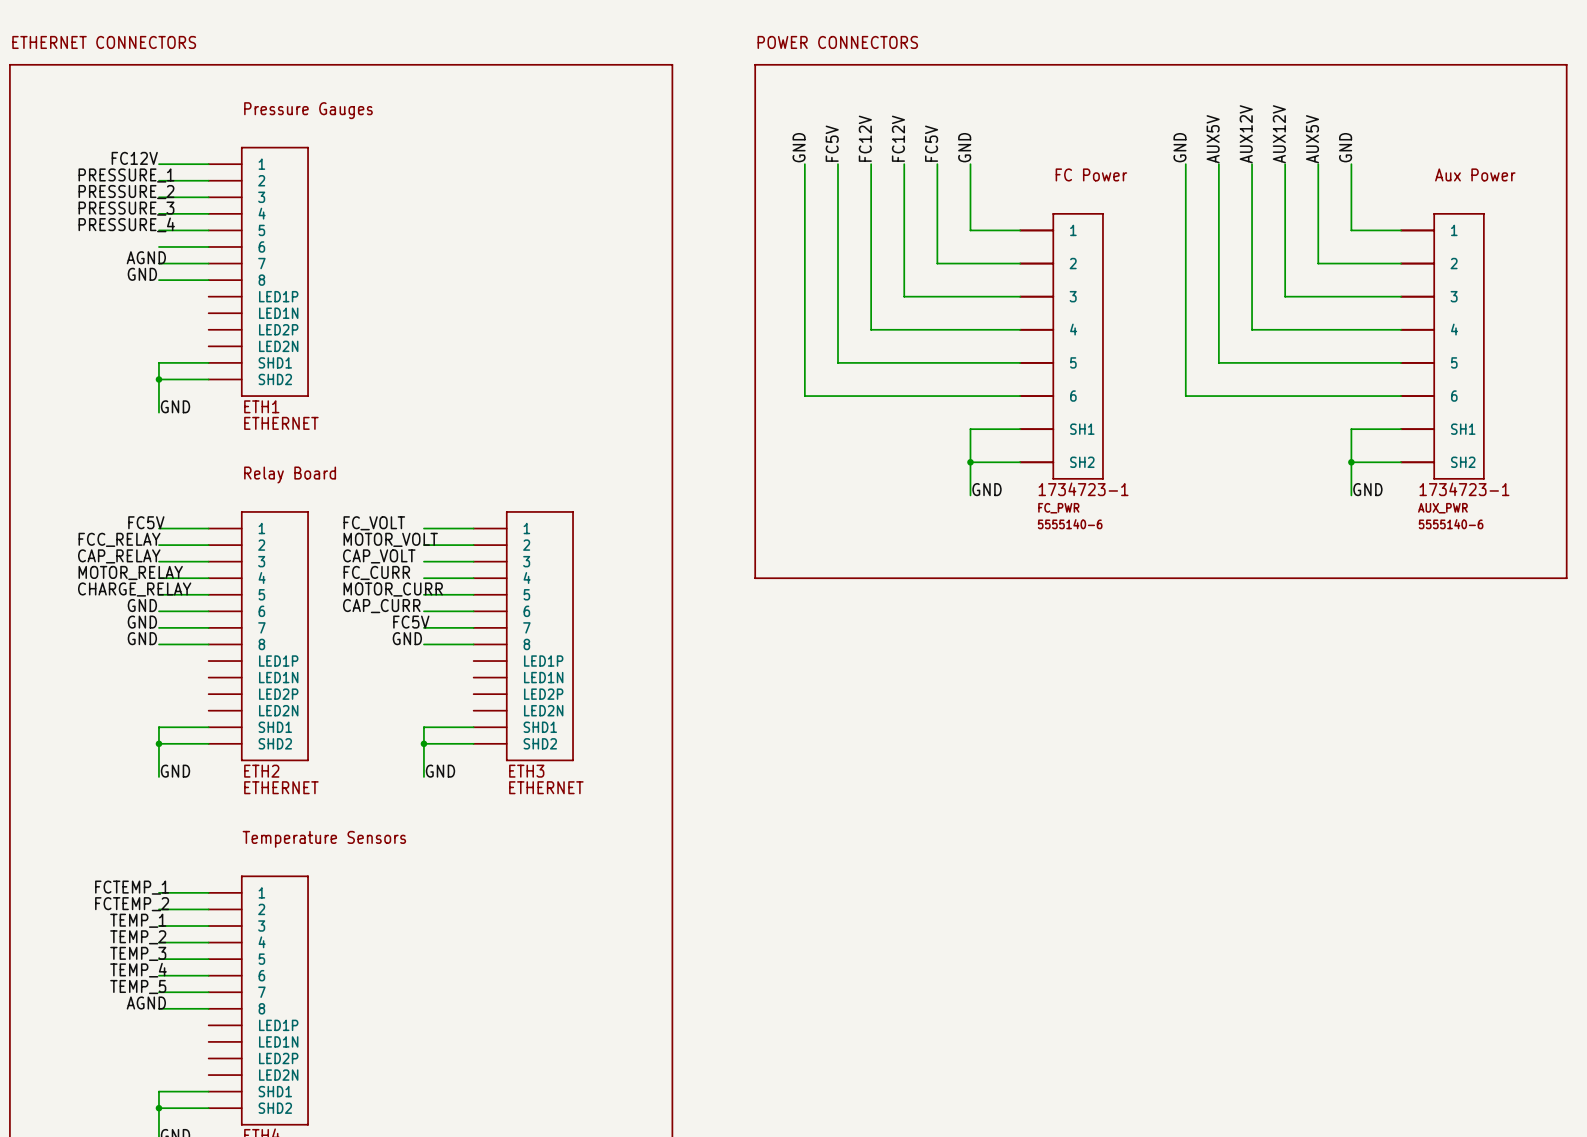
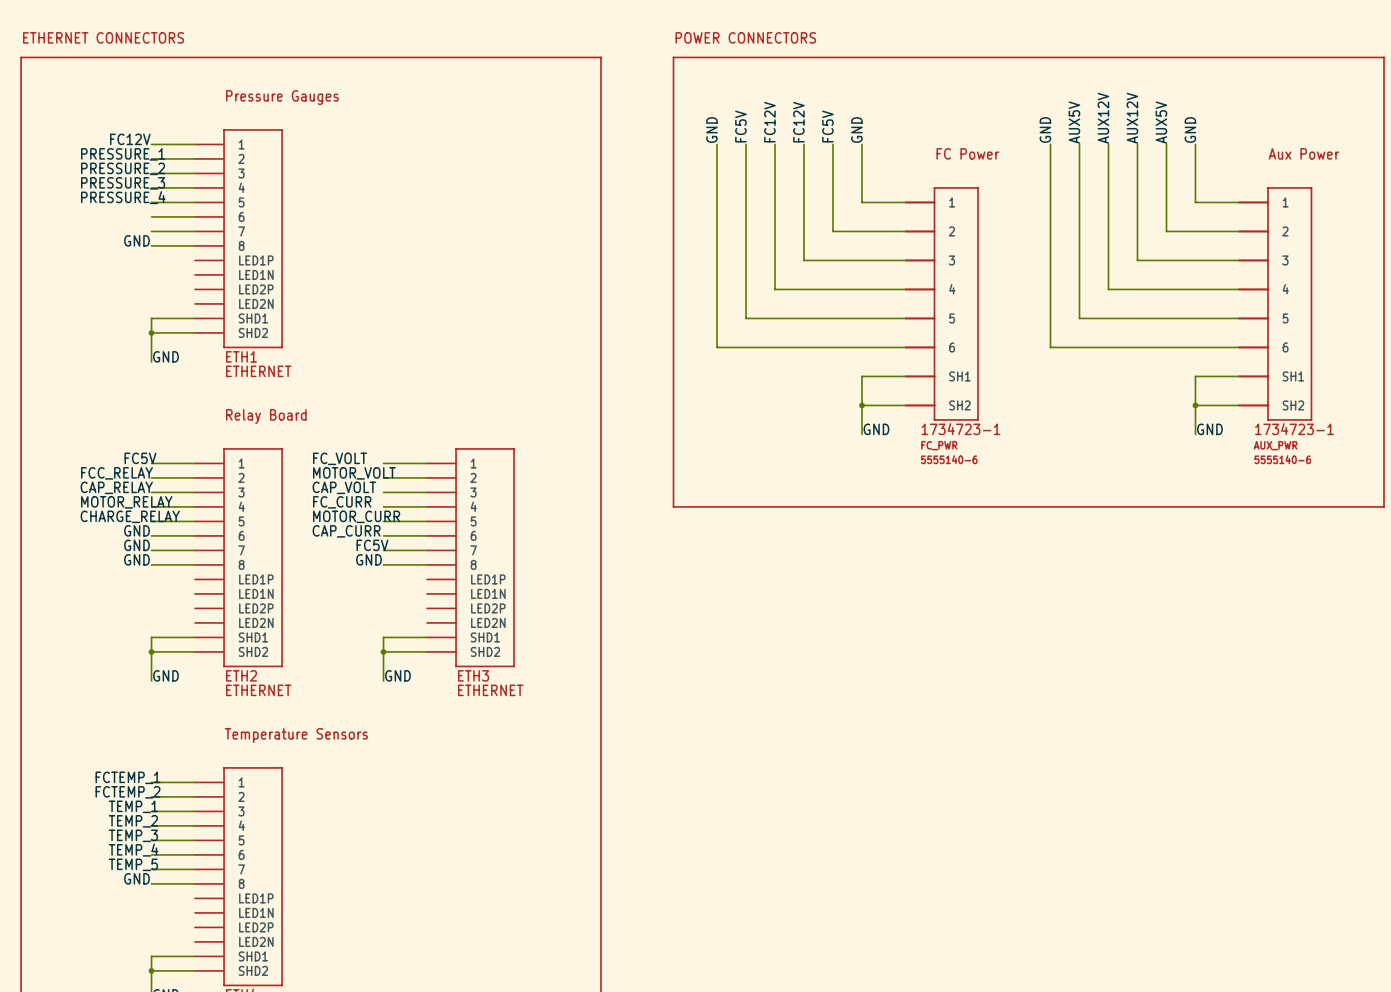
label: AGND (146, 257) -> none
label: AGND (146, 1003) -> GND (136, 878)

